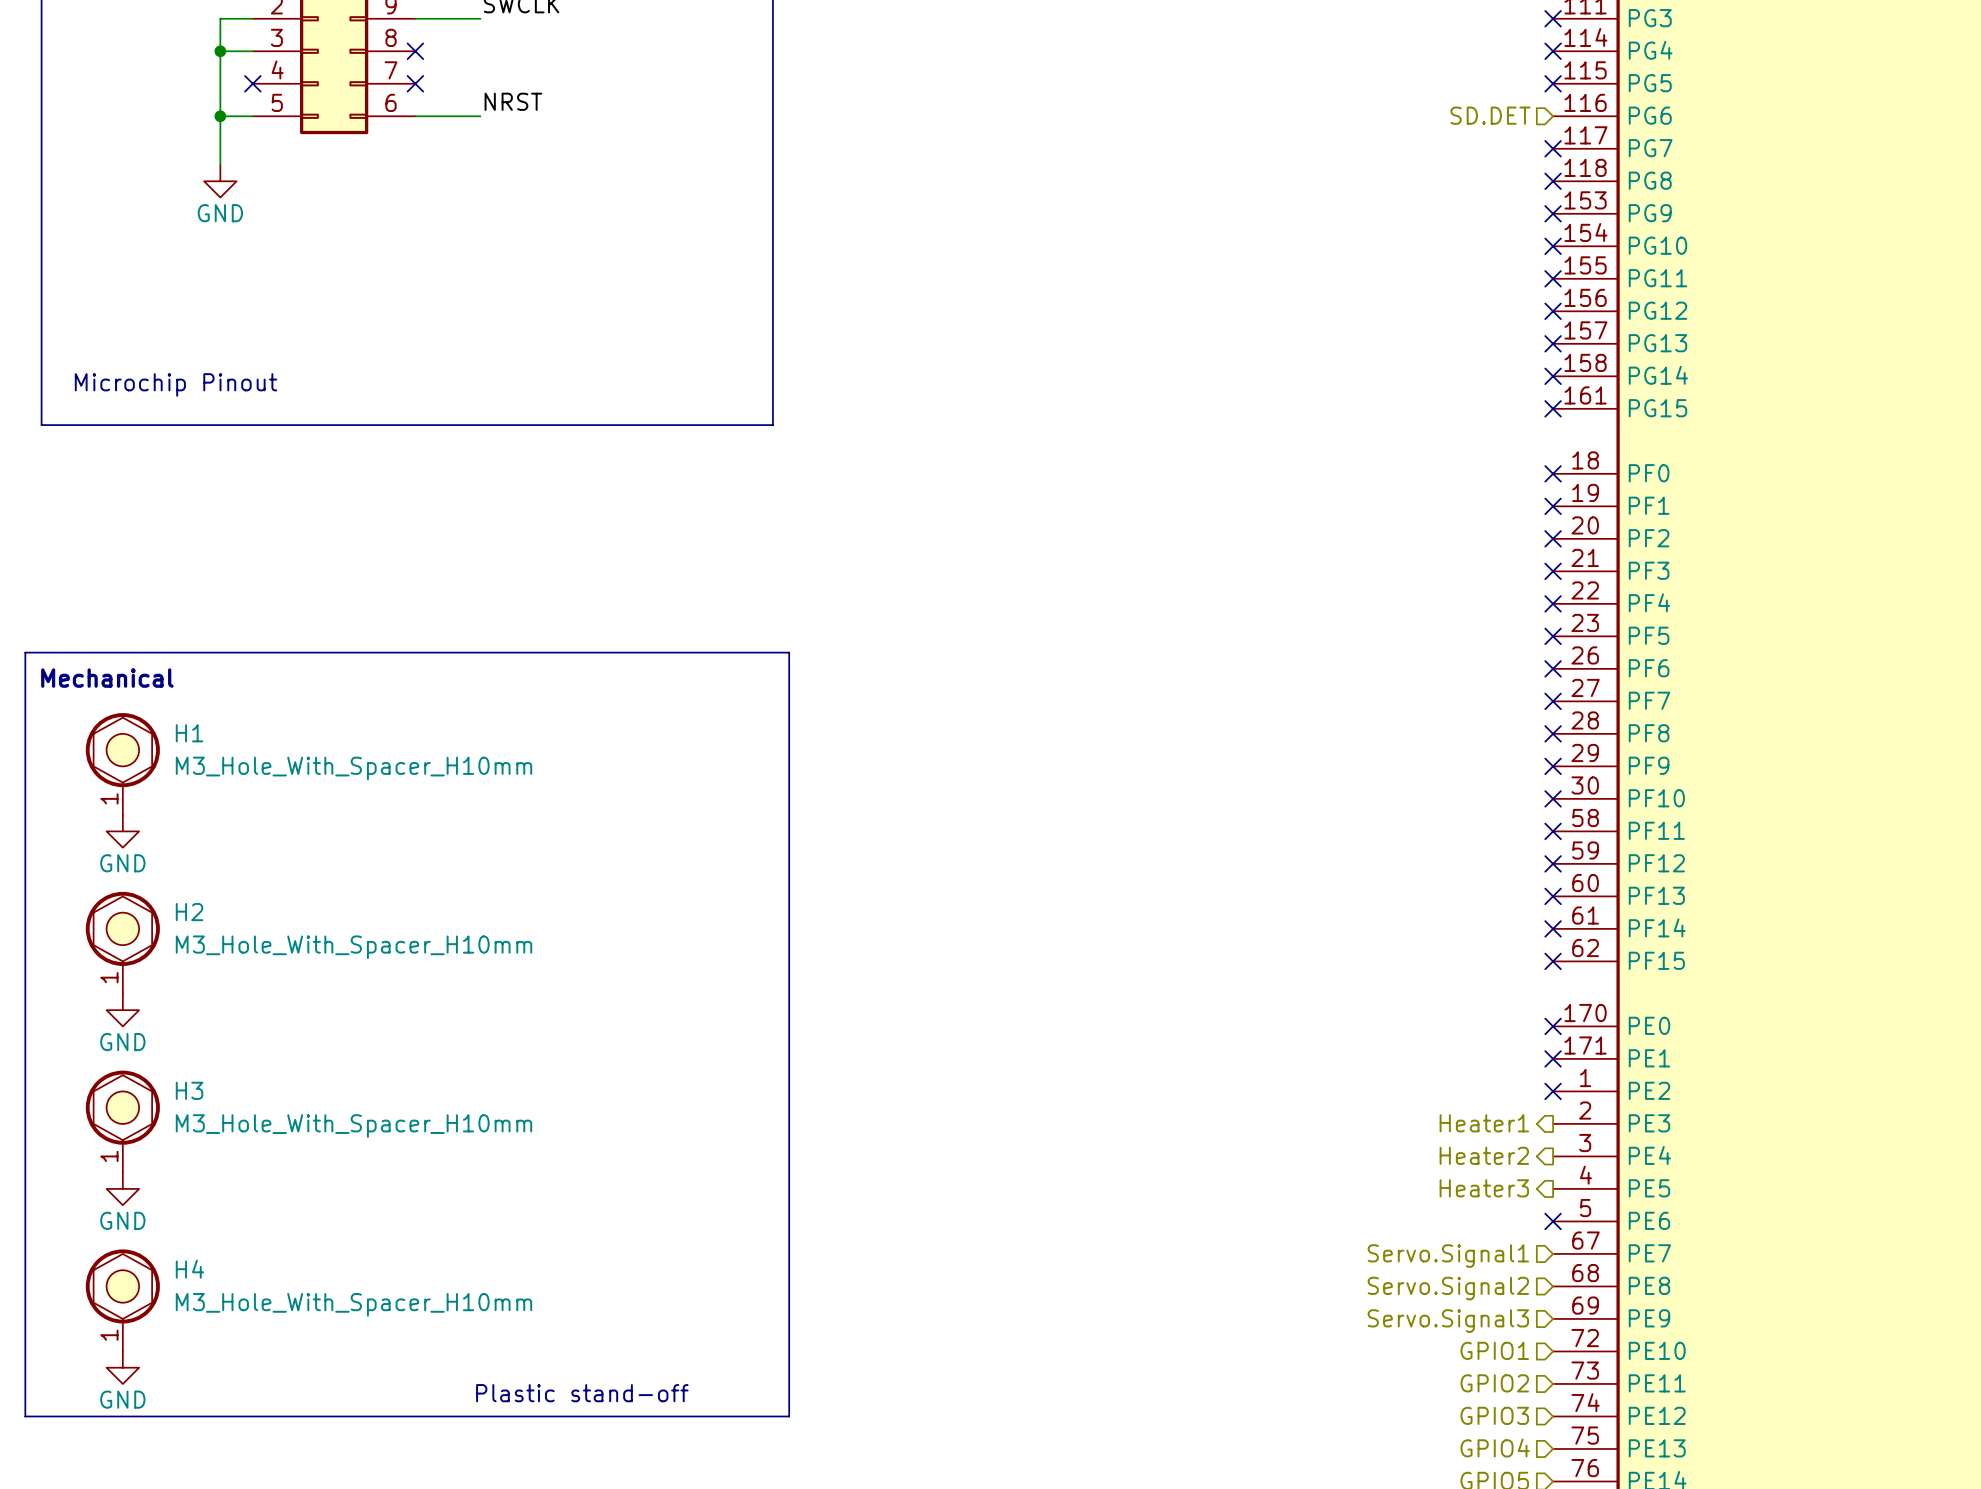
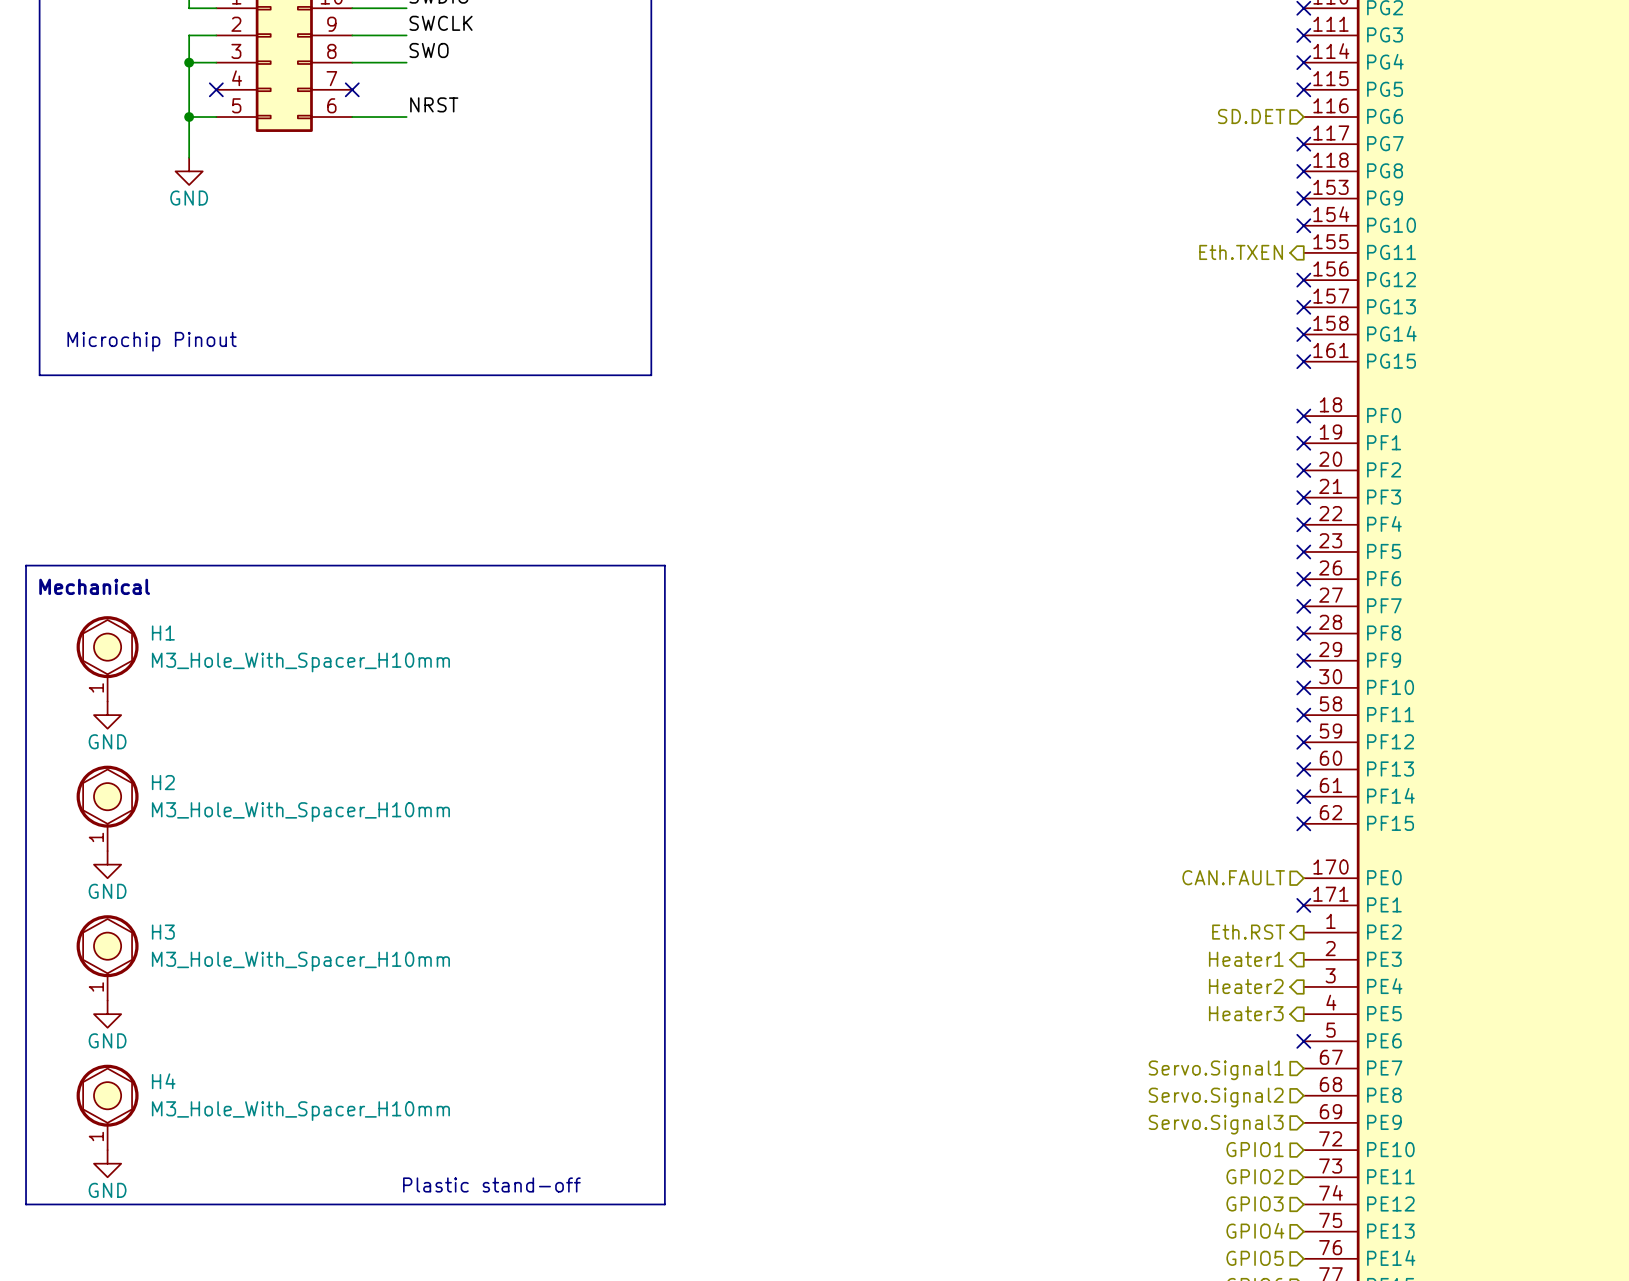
label: none -> SWO (429, 50)
wire: none -> (352, 62) (406, 62)
no-connect mark: (415, 51) -> none
hierarchical label: none -> Eth.TXEN (1241, 252)
no-connect mark: (1553, 278) -> none
hierarchical label: none -> CAN.FAULT (1233, 877)
no-connect mark: (1553, 1026) -> none
hierarchical label: none -> Eth.RST (1248, 932)
no-connect mark: (1553, 1091) -> none

